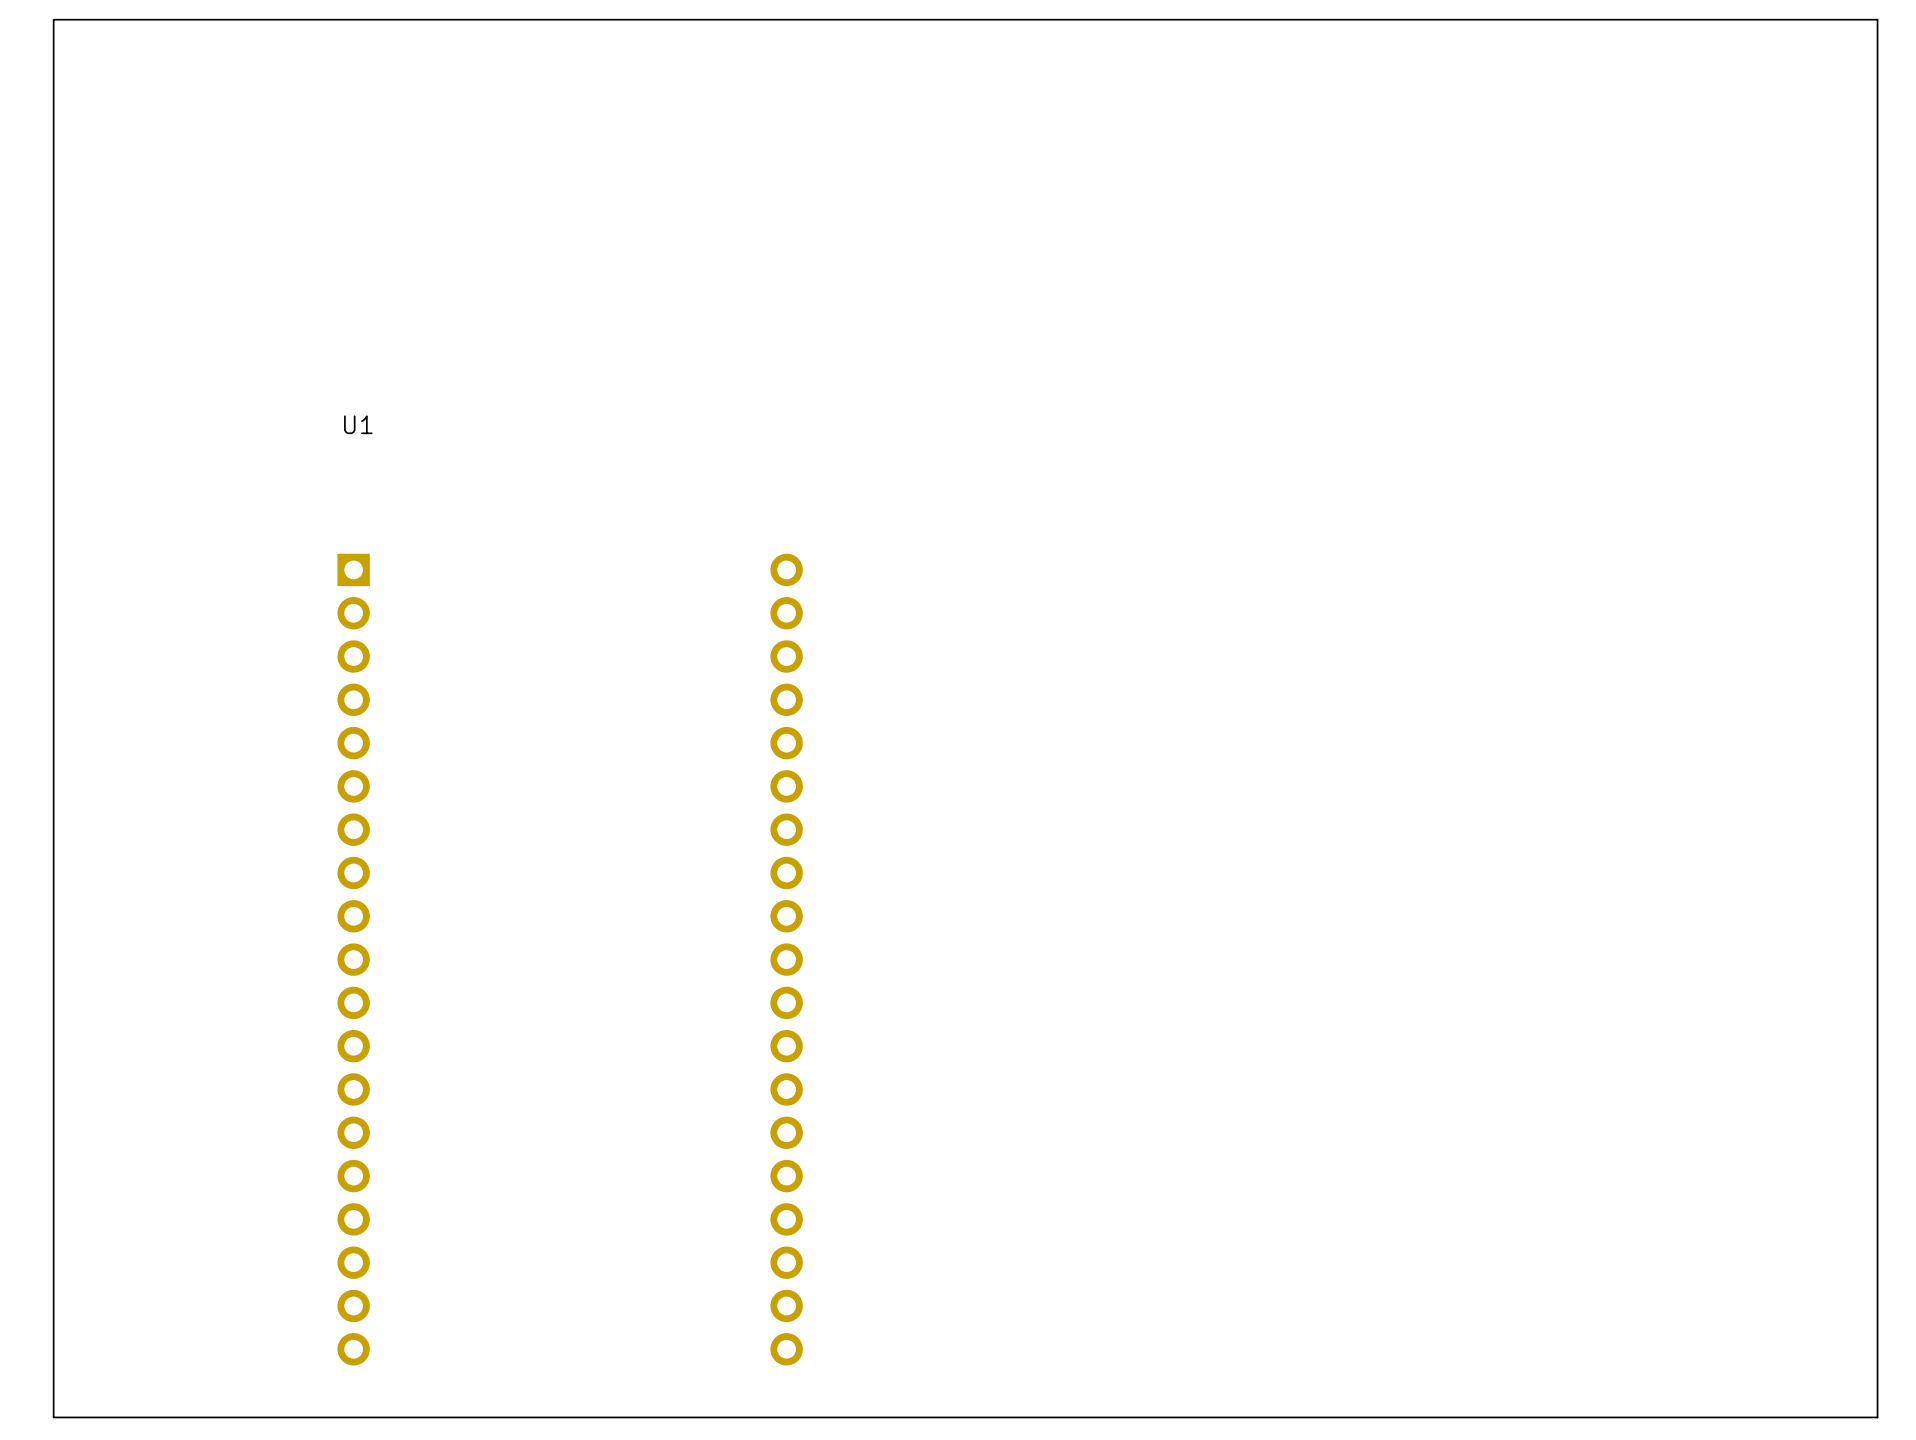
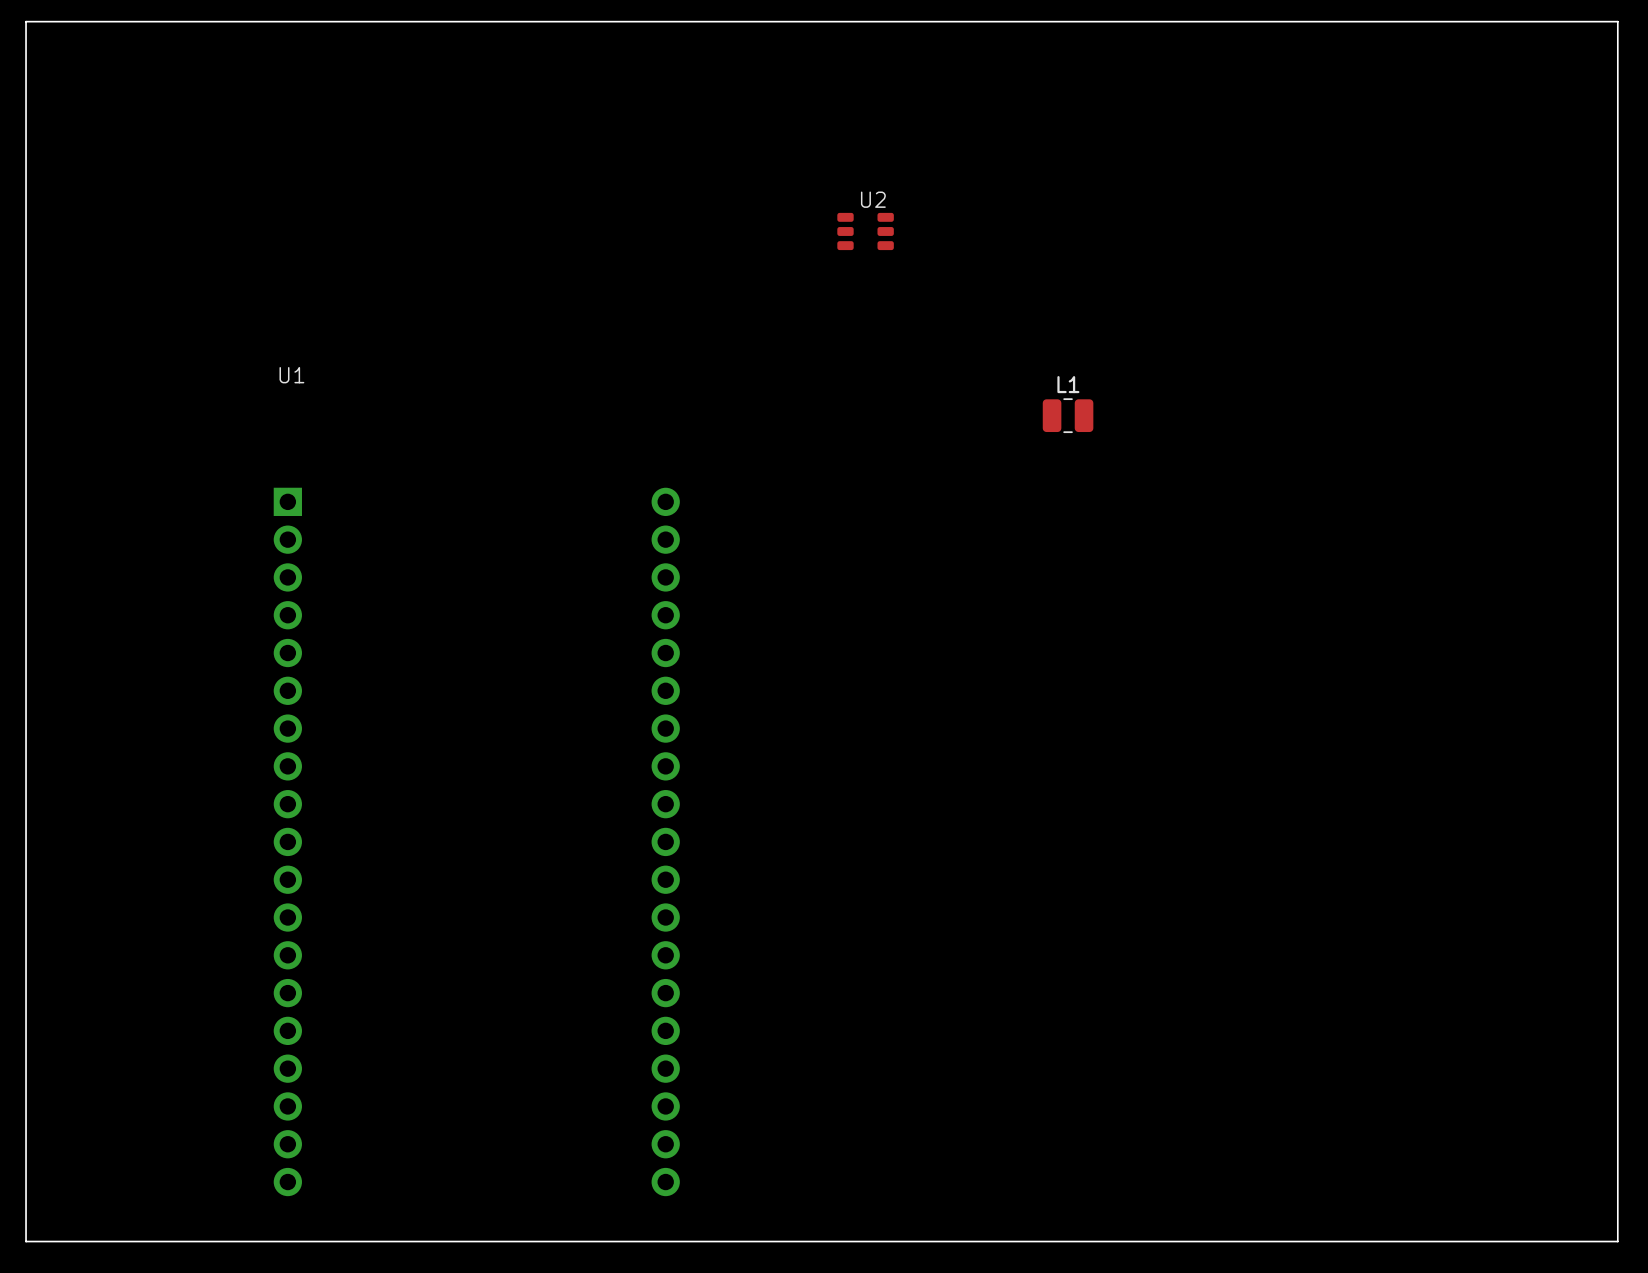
U2: none -> (865, 231)
L1: none -> (1068, 415)

